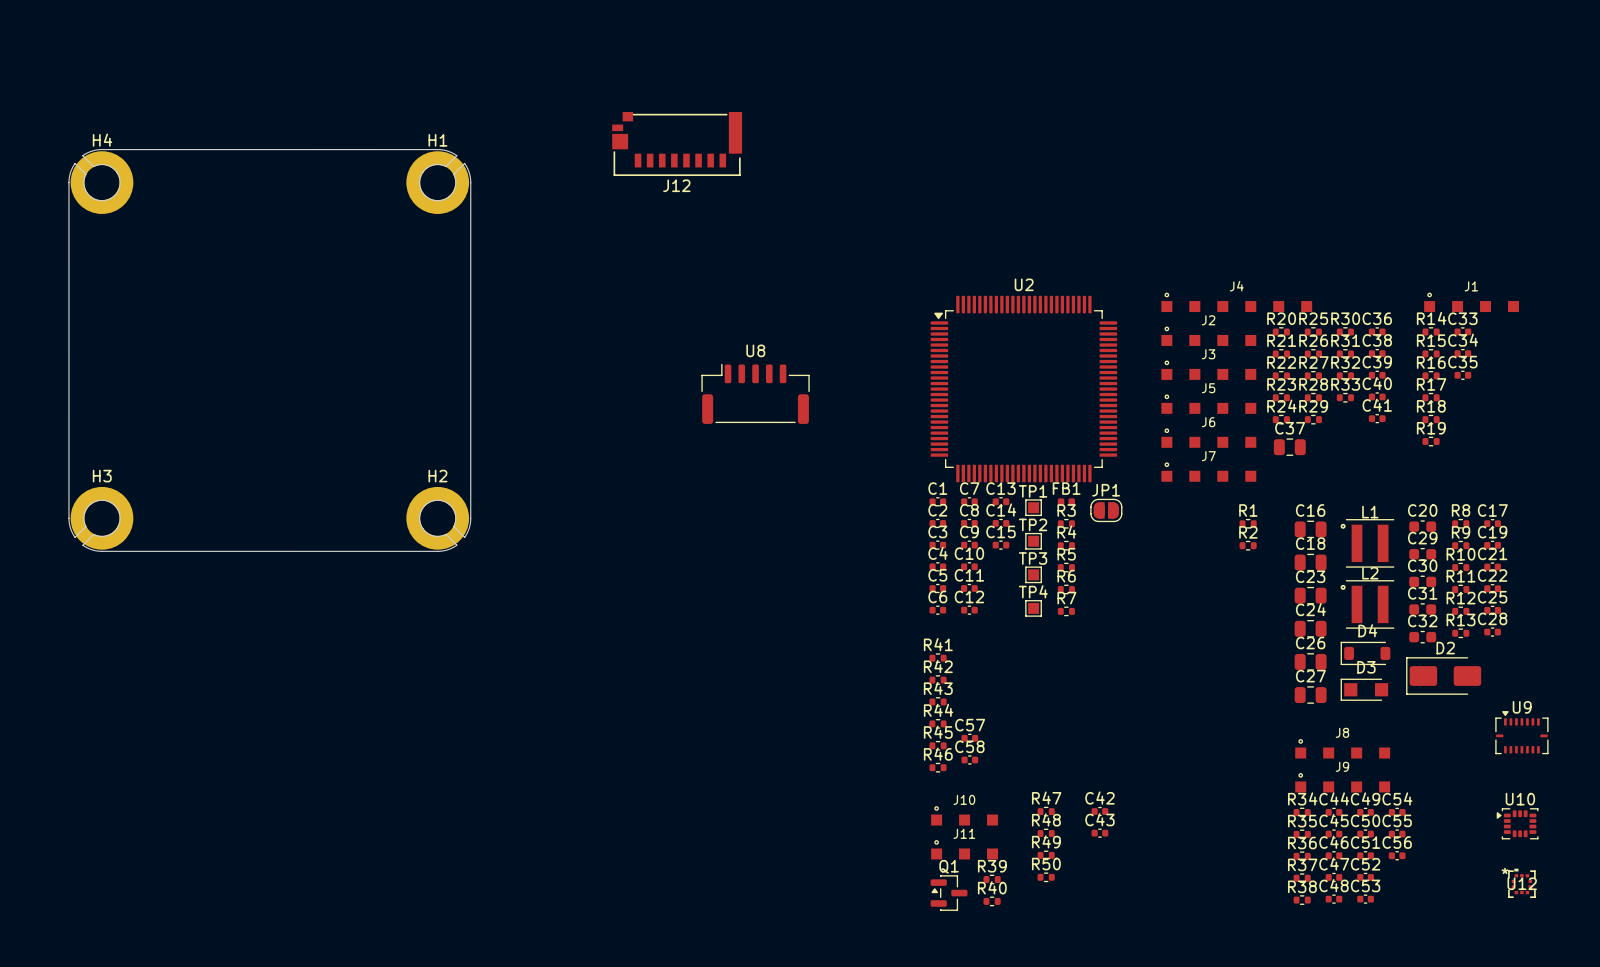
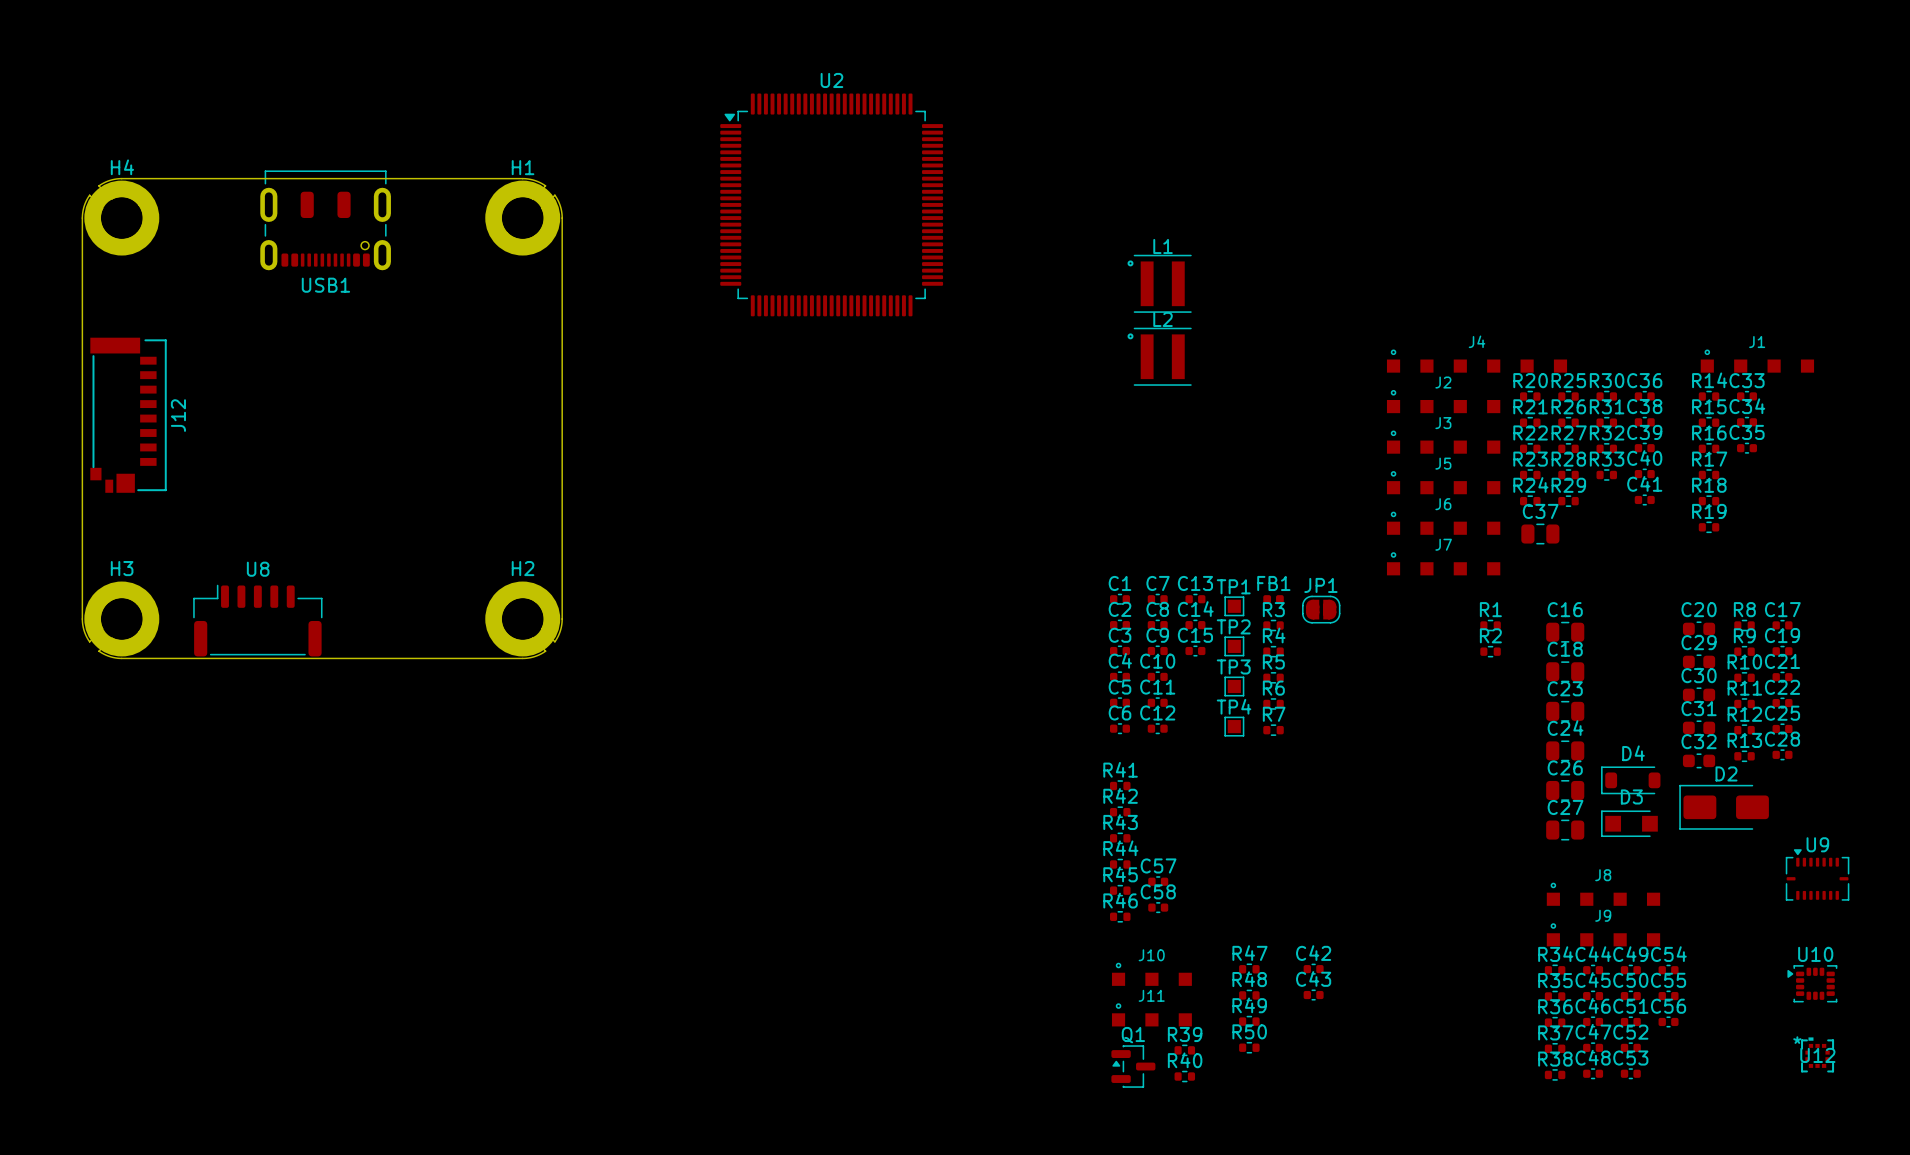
J12 rotation: 0° (677, 143) -> 90° counterclockwise (128, 415)
J12 position: (677, 143) -> (128, 415)
USB1: none -> (325, 220)
U2 position: (1023, 389) -> (831, 204)
U8 position: (755, 393) -> (257, 620)
L1 position: (1367, 543) -> (1159, 283)
L2 position: (1367, 604) -> (1159, 356)

